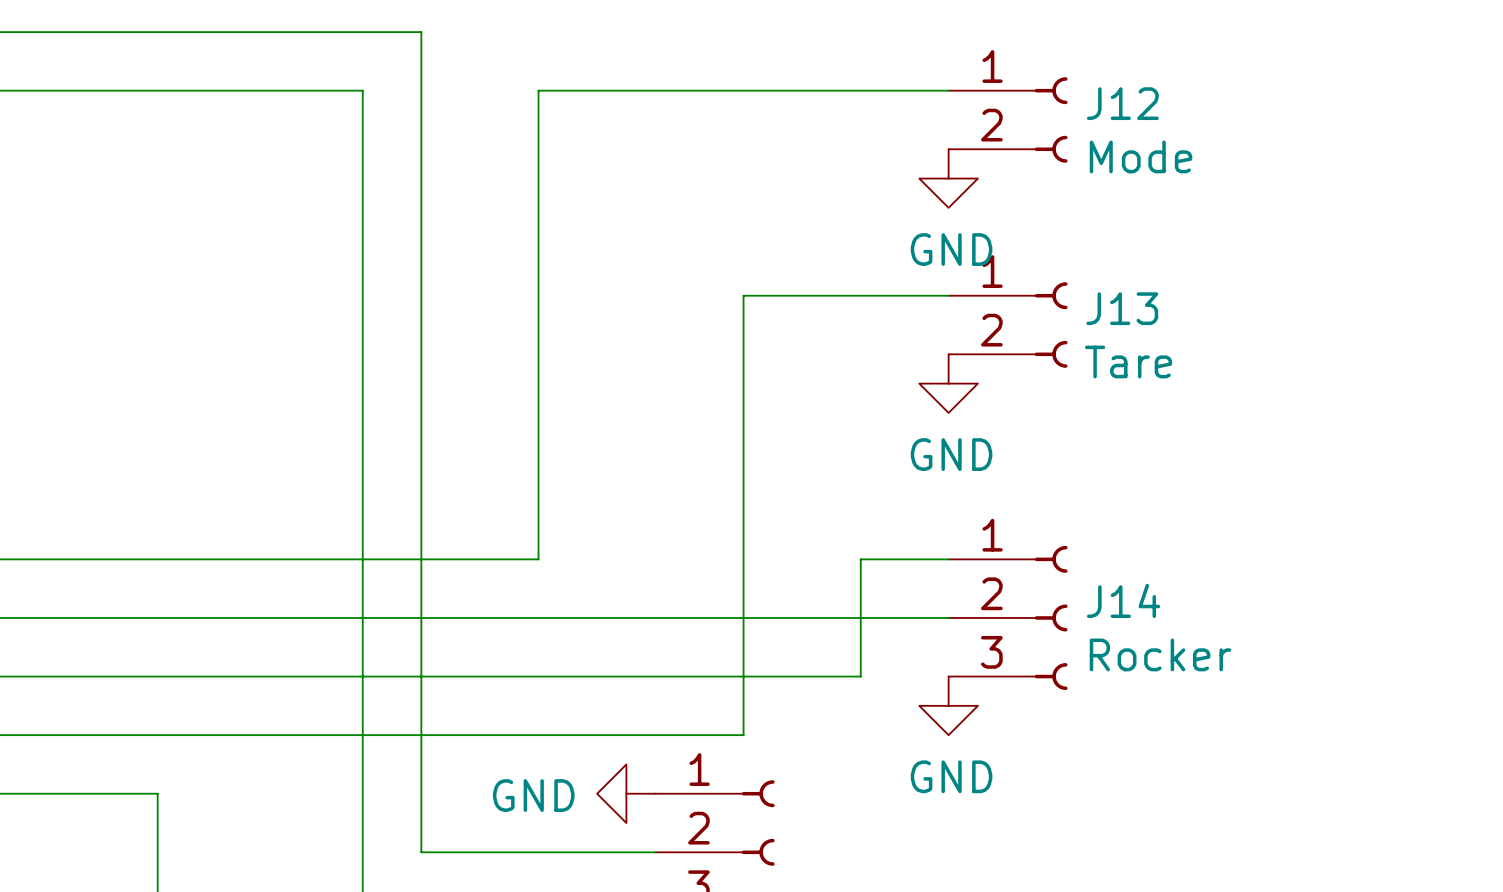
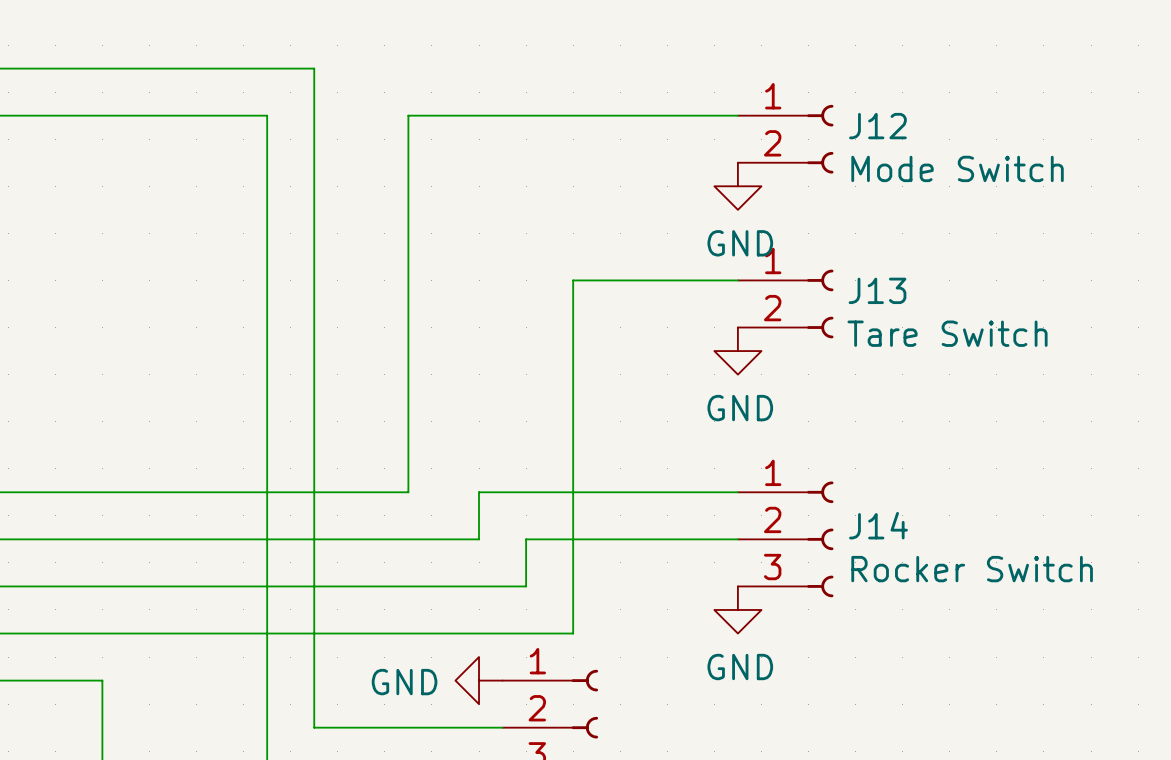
J12 value: Mode (1141, 156) -> Mode Switch (957, 168)
J13 value: Tare (1128, 362) -> Tare Switch (947, 333)
wire: (860, 559) (860, 676) (684, 676) -> (667, 492) (479, 492) (479, 539)
wire: (626, 617) (684, 617) -> (526, 586) (526, 539)
J14 value: Rocker (1160, 654) -> Rocker Switch (972, 569)

